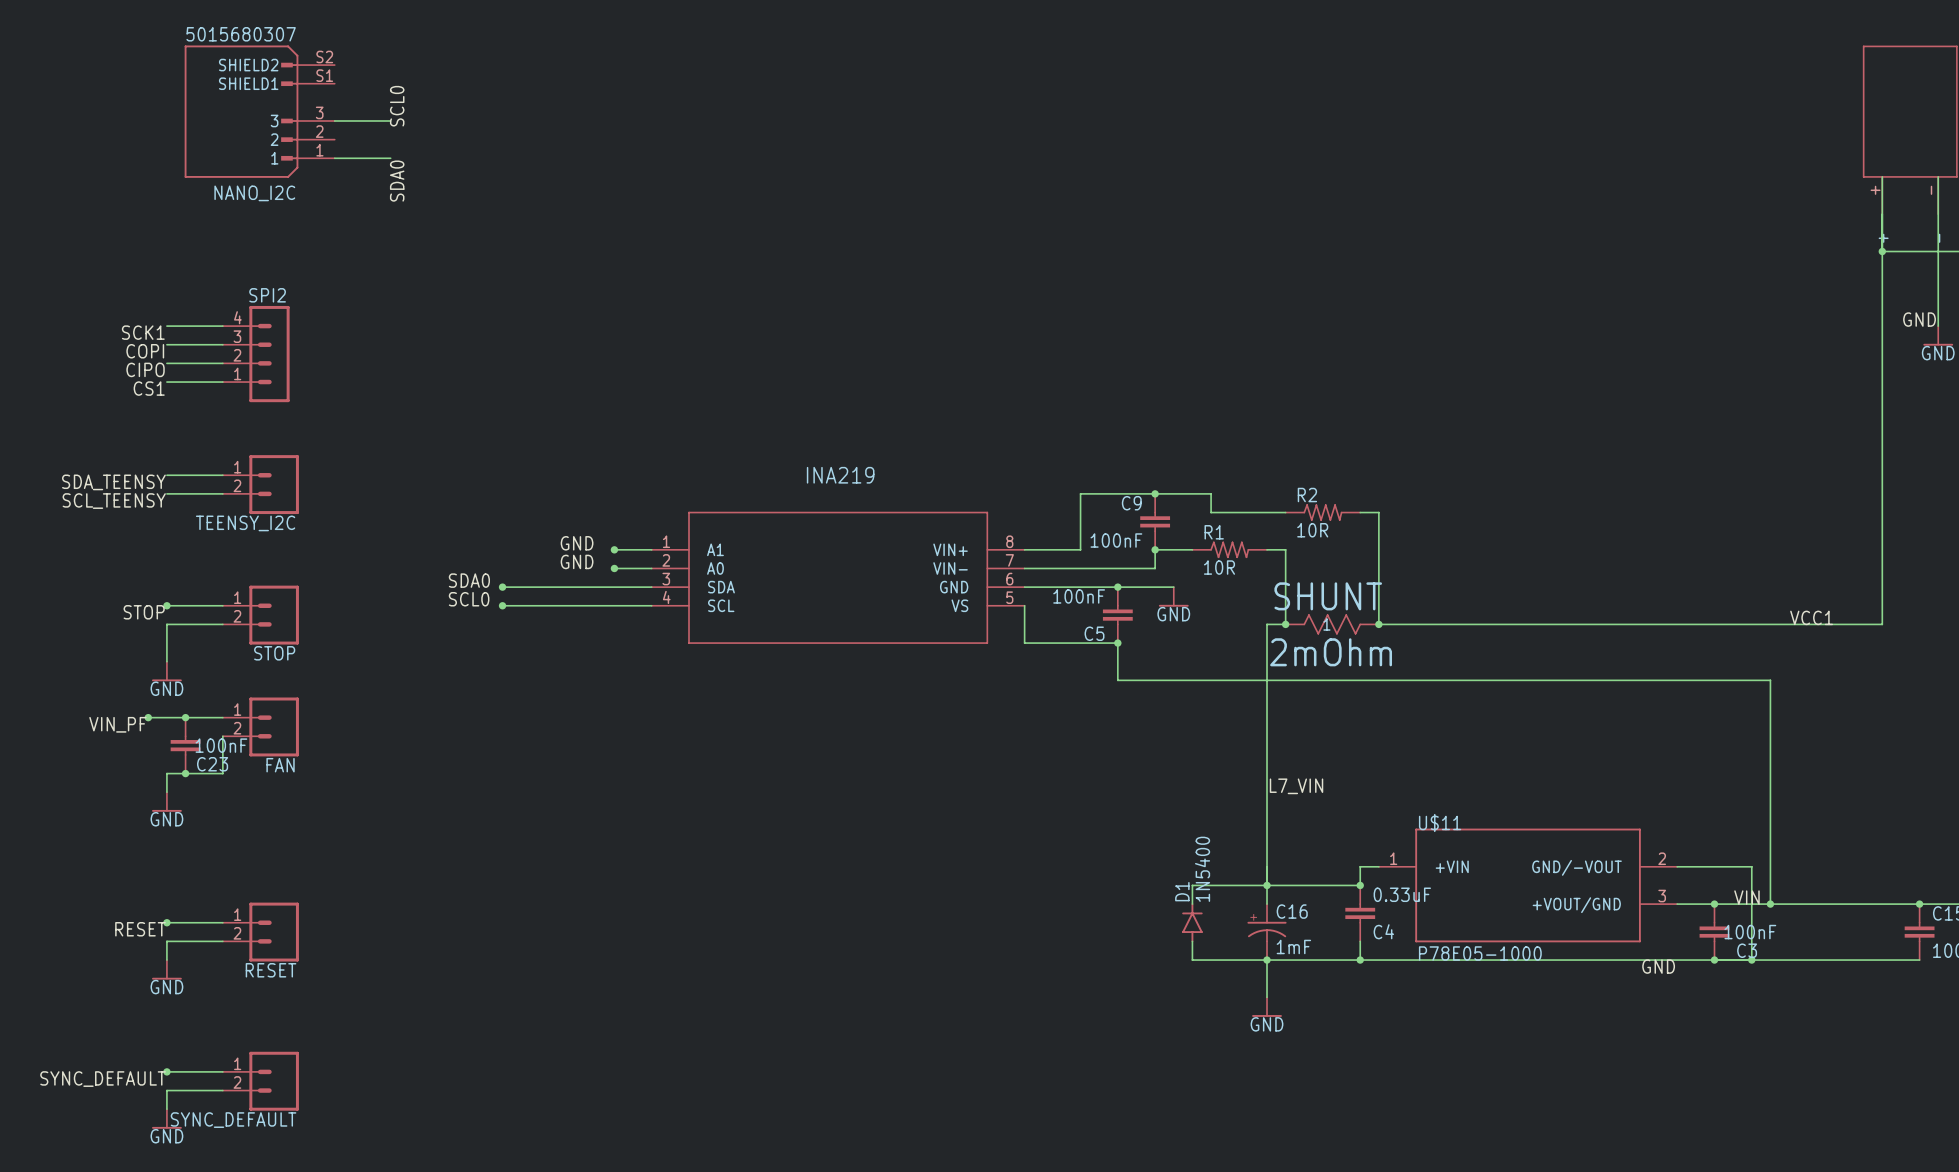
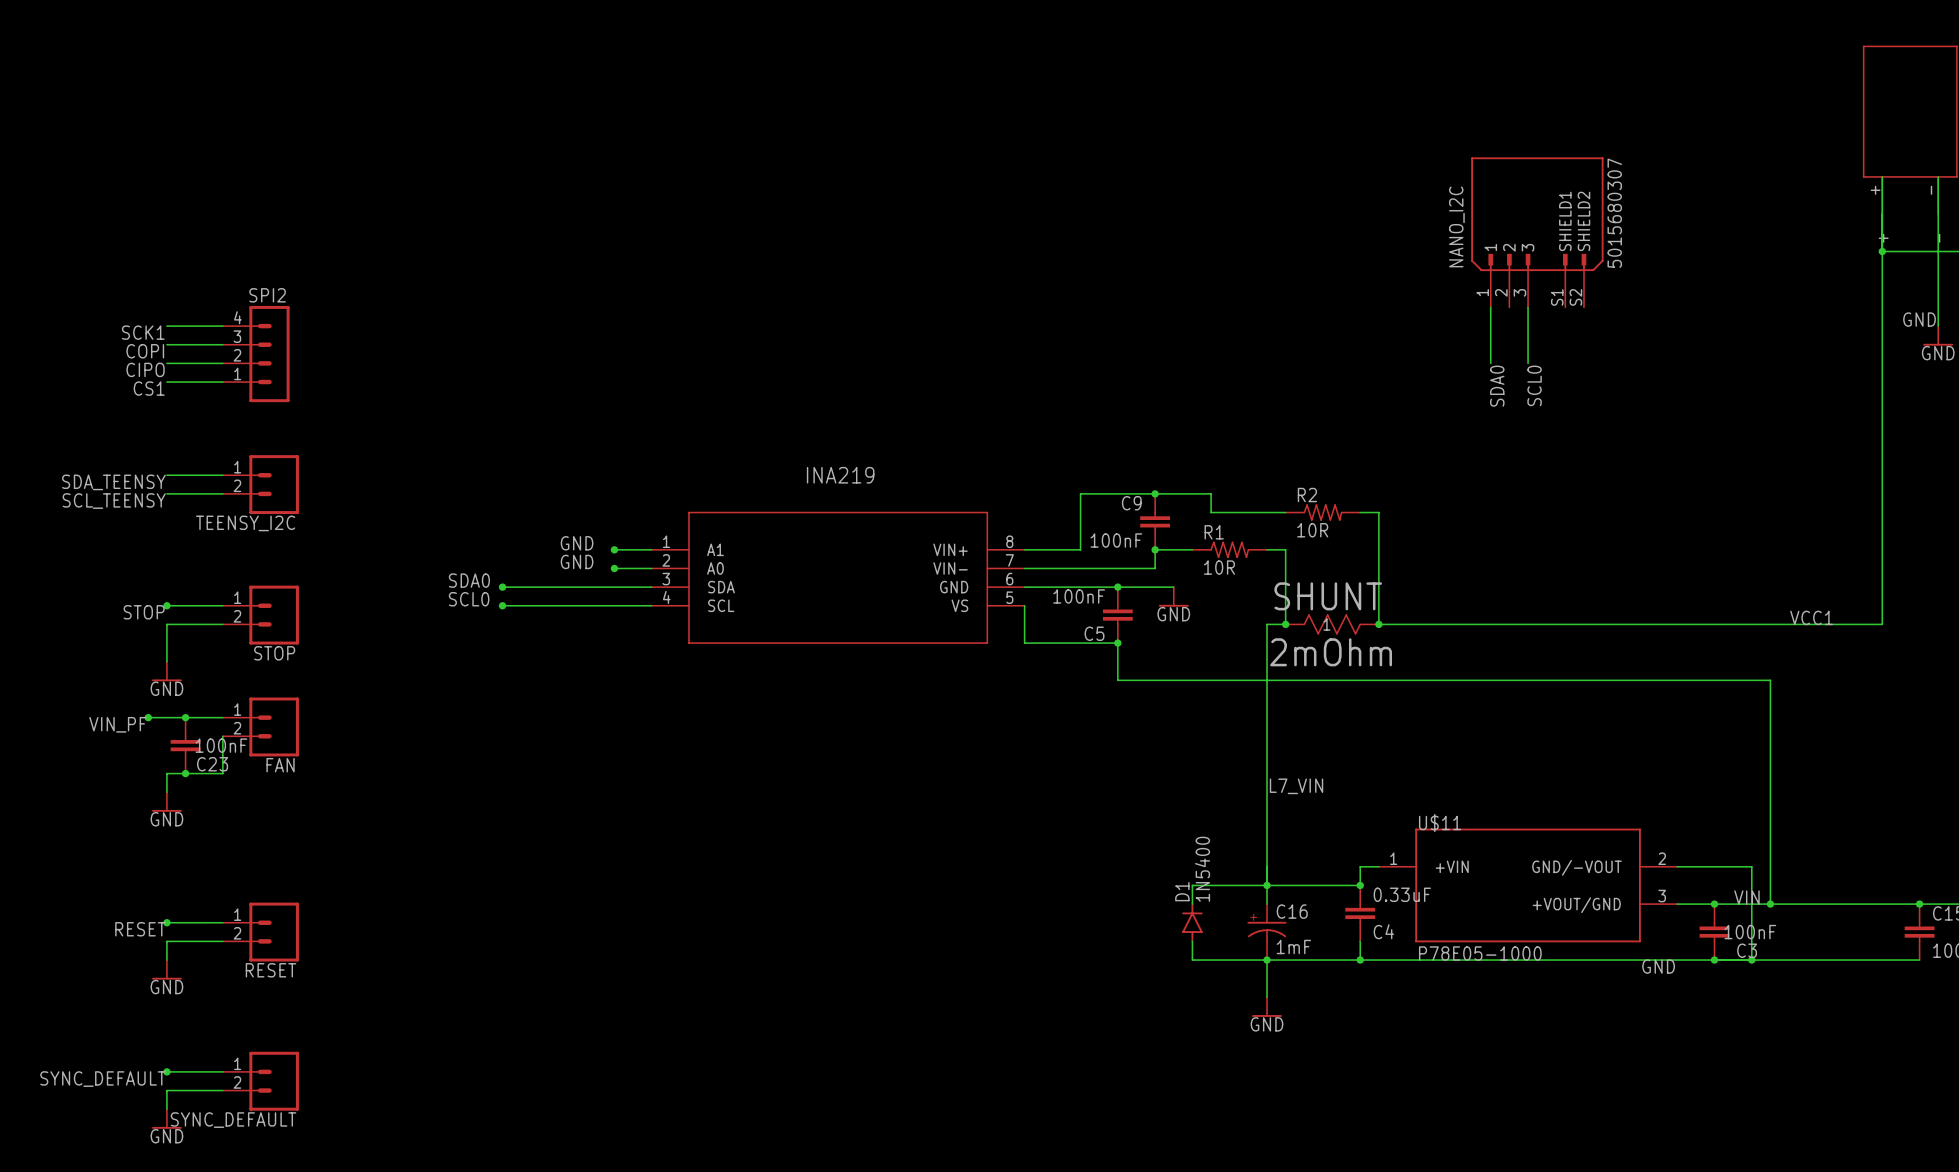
label: SCL0 (397, 106) -> none
NANO_I2C rotation: 0° (241, 111) -> 90° clockwise (1537, 214)
NANO_I2C position: (259, 111) -> (1537, 232)
wire: (334, 120) (390, 120) -> none
wire: (334, 158) (390, 158) -> none
label: SDA0 (397, 181) -> none
wire: none -> (1490, 307) (1490, 363)
wire: none -> (1528, 307) (1528, 363)
label: none -> SCL0 (1534, 385)
label: none -> SDA0 (1497, 386)

